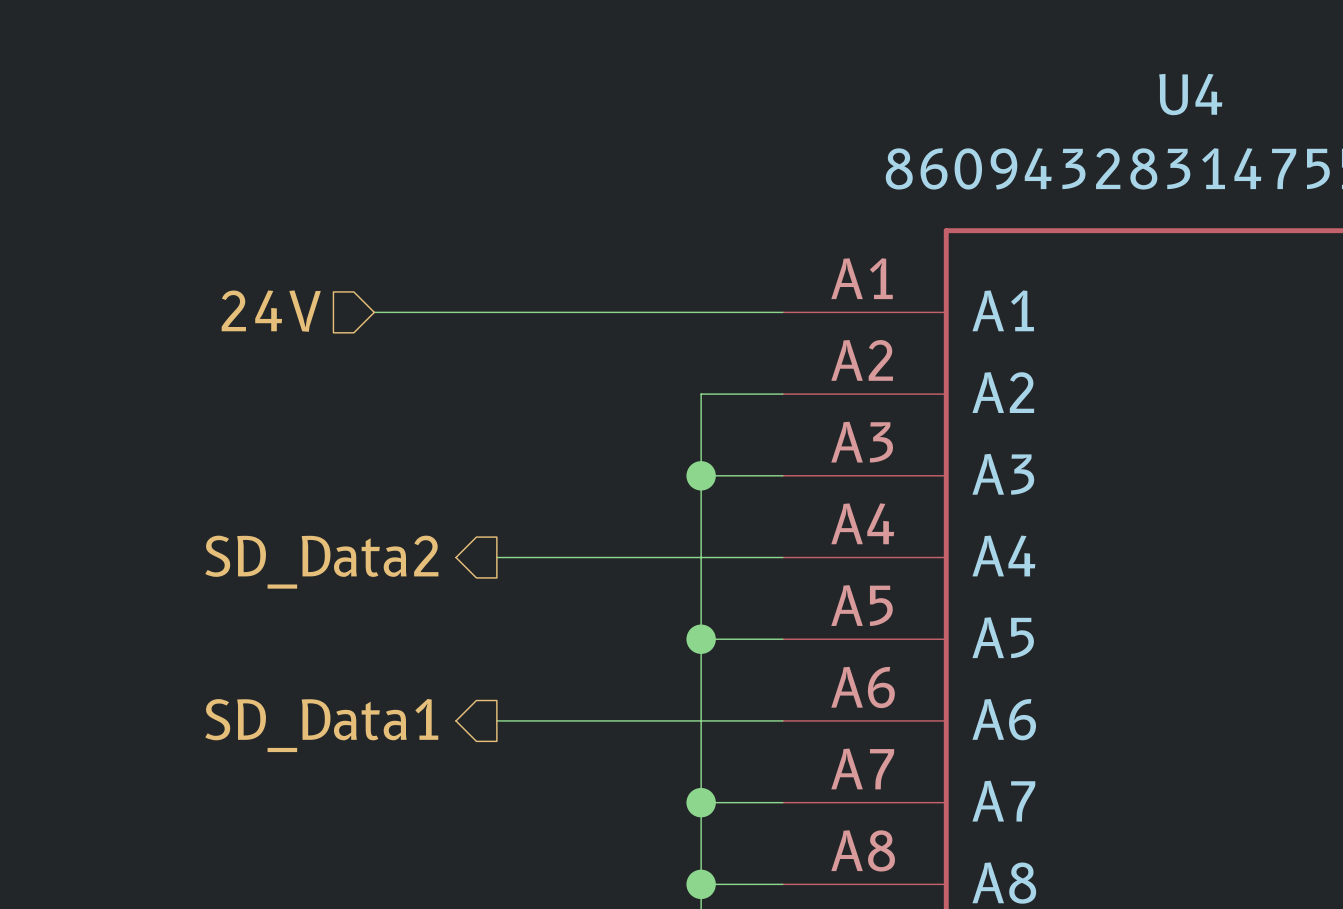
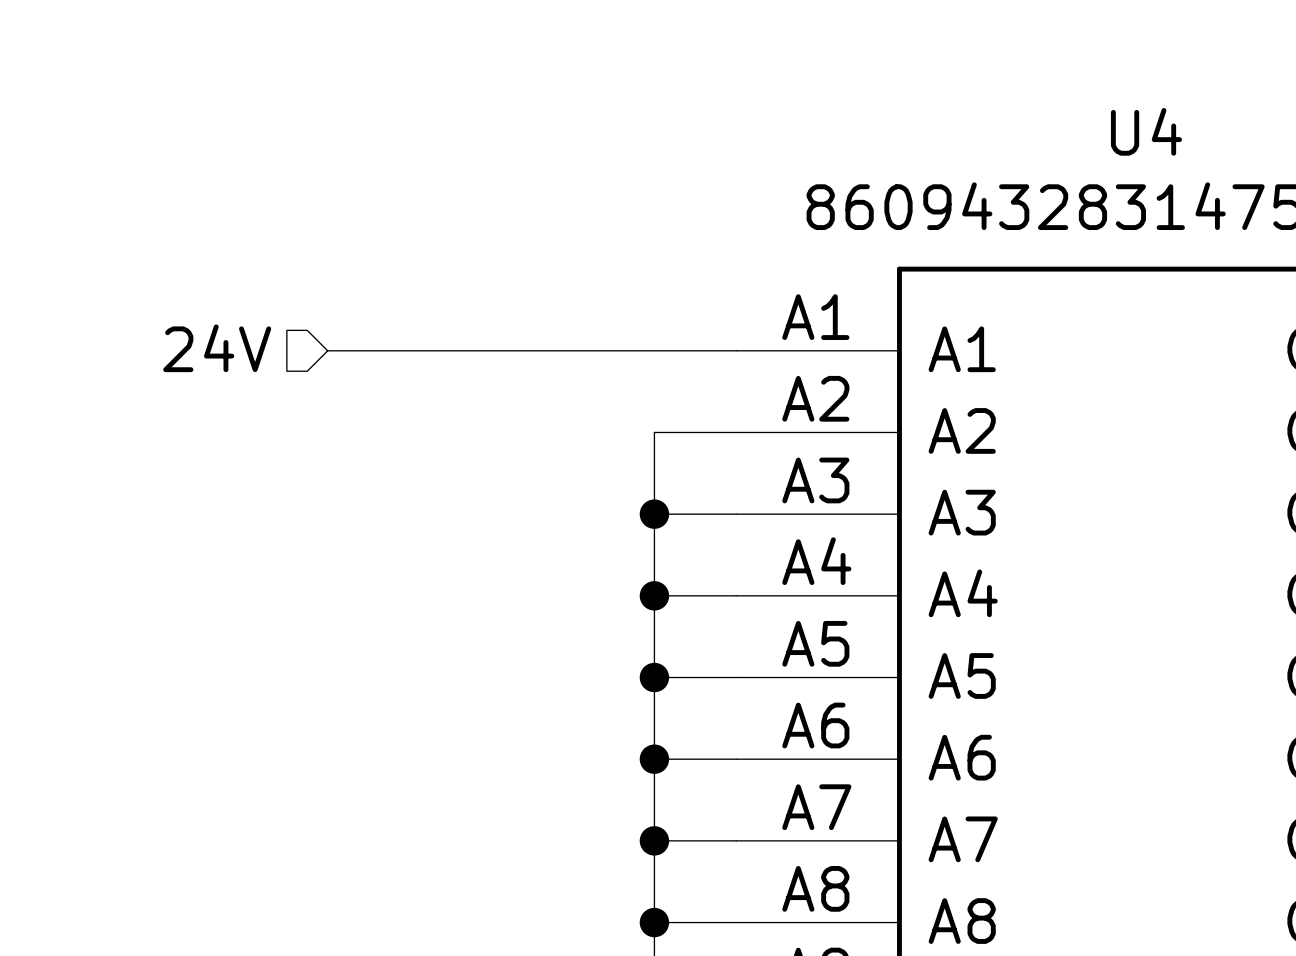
wire: (496, 557) (701, 557) -> none
junction: none -> (654, 595)
hierarchical label: SD_Data2 (321, 562) -> none
wire: (496, 720) (701, 720) -> none
junction: none -> (654, 759)
hierarchical label: SD_Data1 (321, 725) -> none

